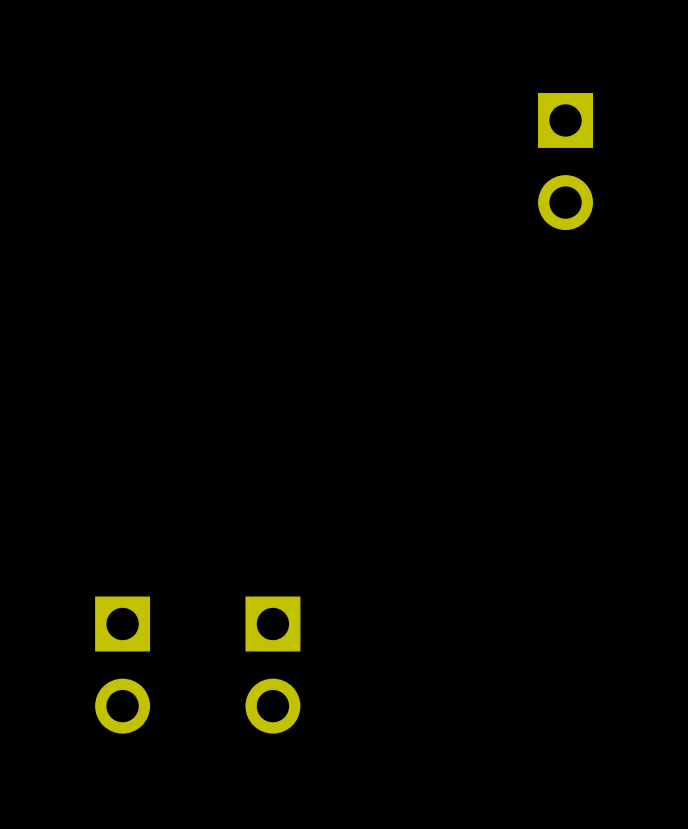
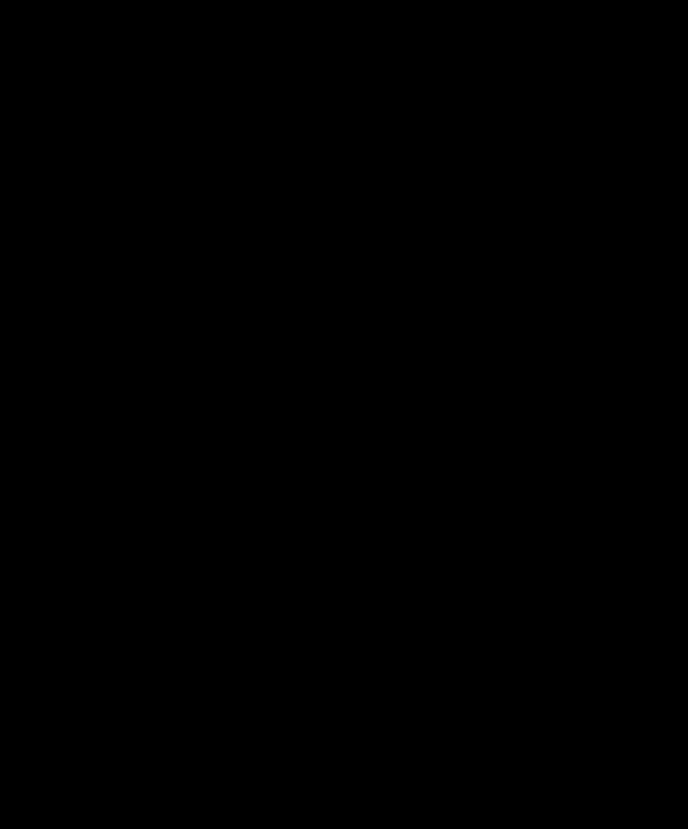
part: (565, 161) -> none
part: (122, 665) -> none
part: (272, 665) -> none

